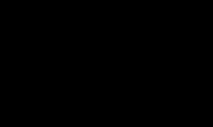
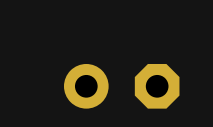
part: none -> (121, 86)

